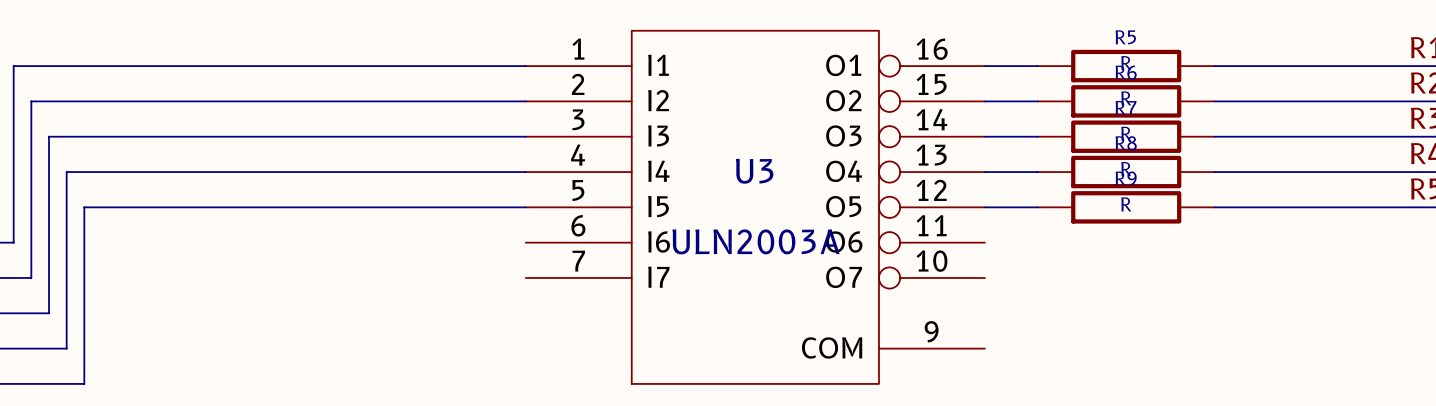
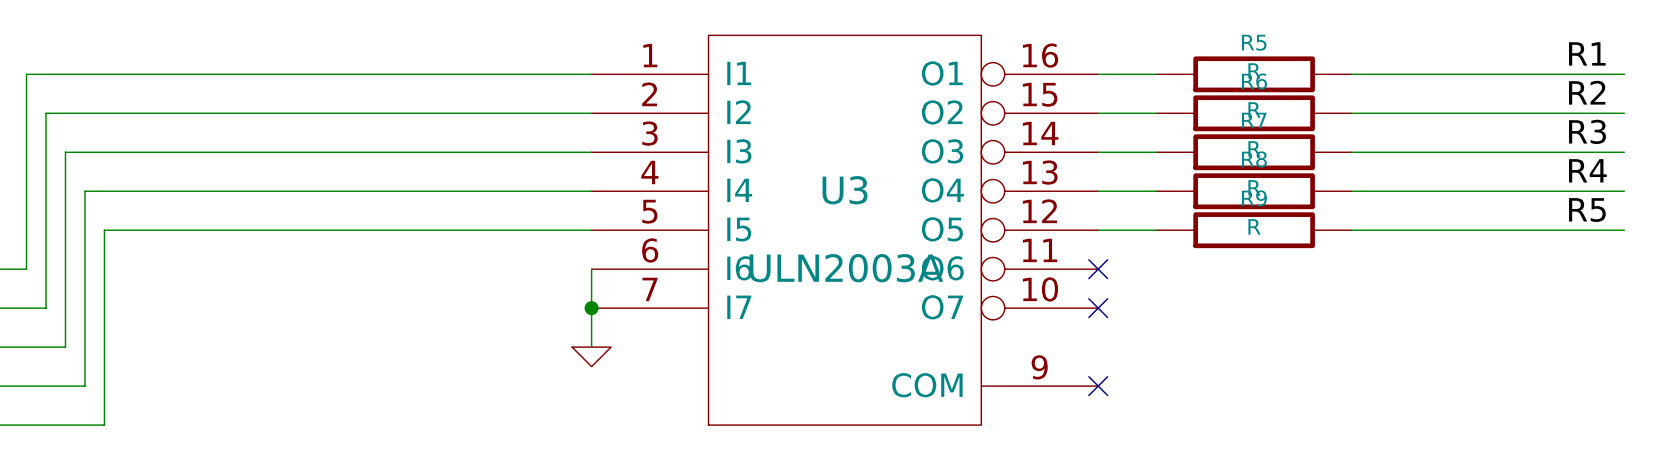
wire: none -> (591, 269) (591, 347)
no-connect mark: none -> (1098, 269)
junction: none -> (591, 308)
no-connect mark: none -> (1098, 308)
power symbol: none -> (591, 356)
no-connect mark: none -> (1098, 386)

